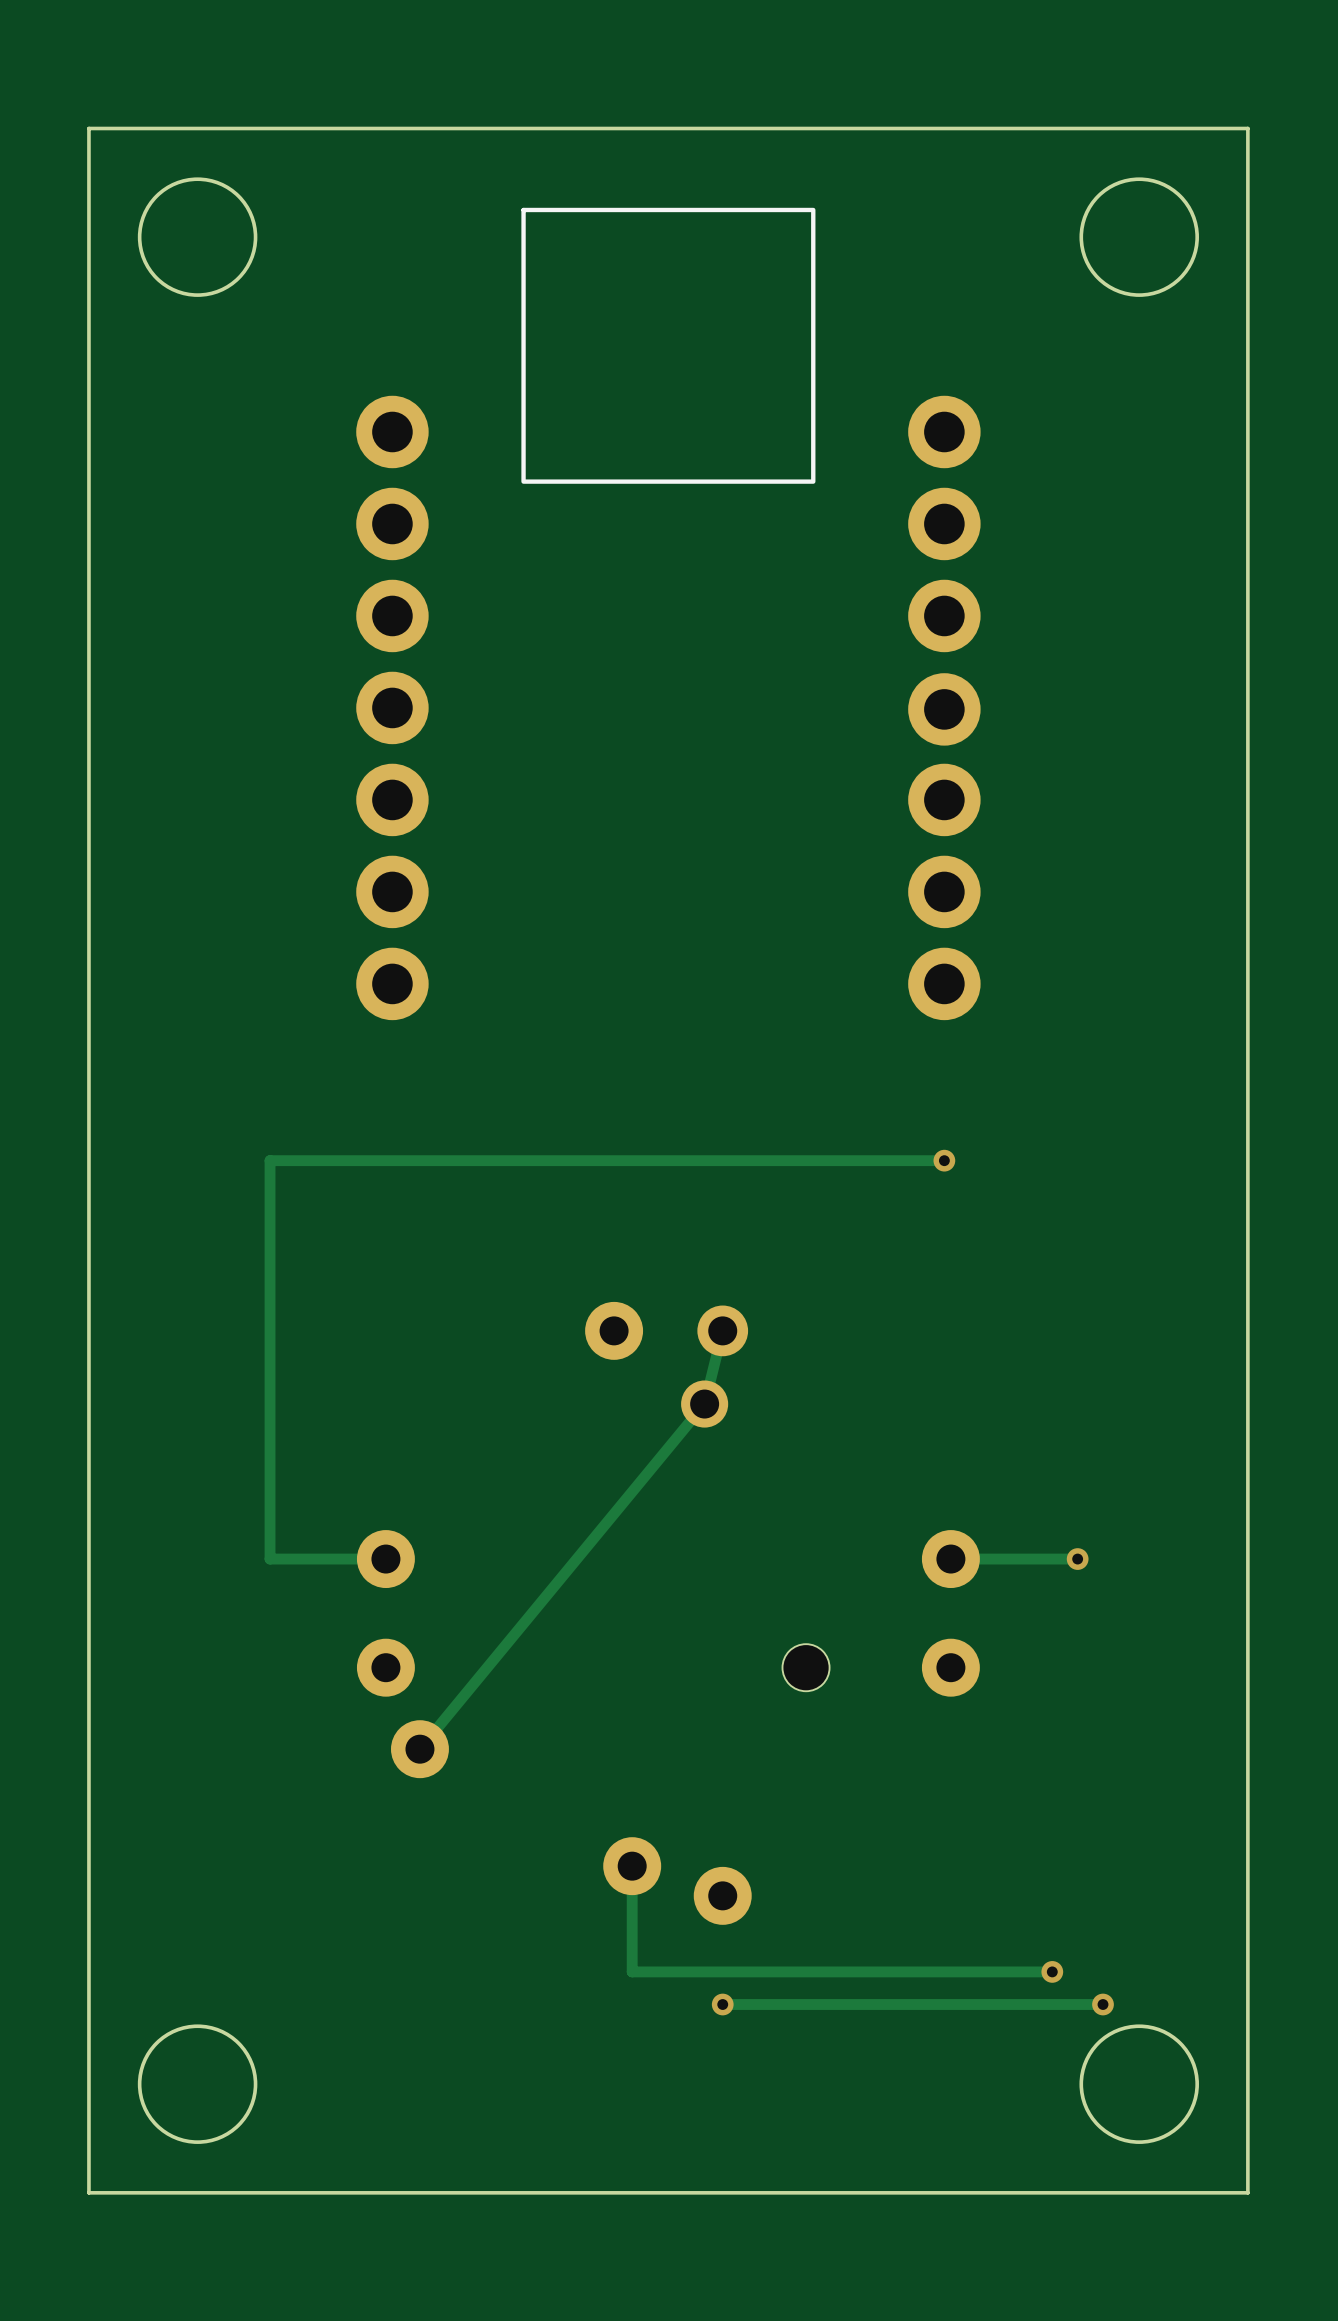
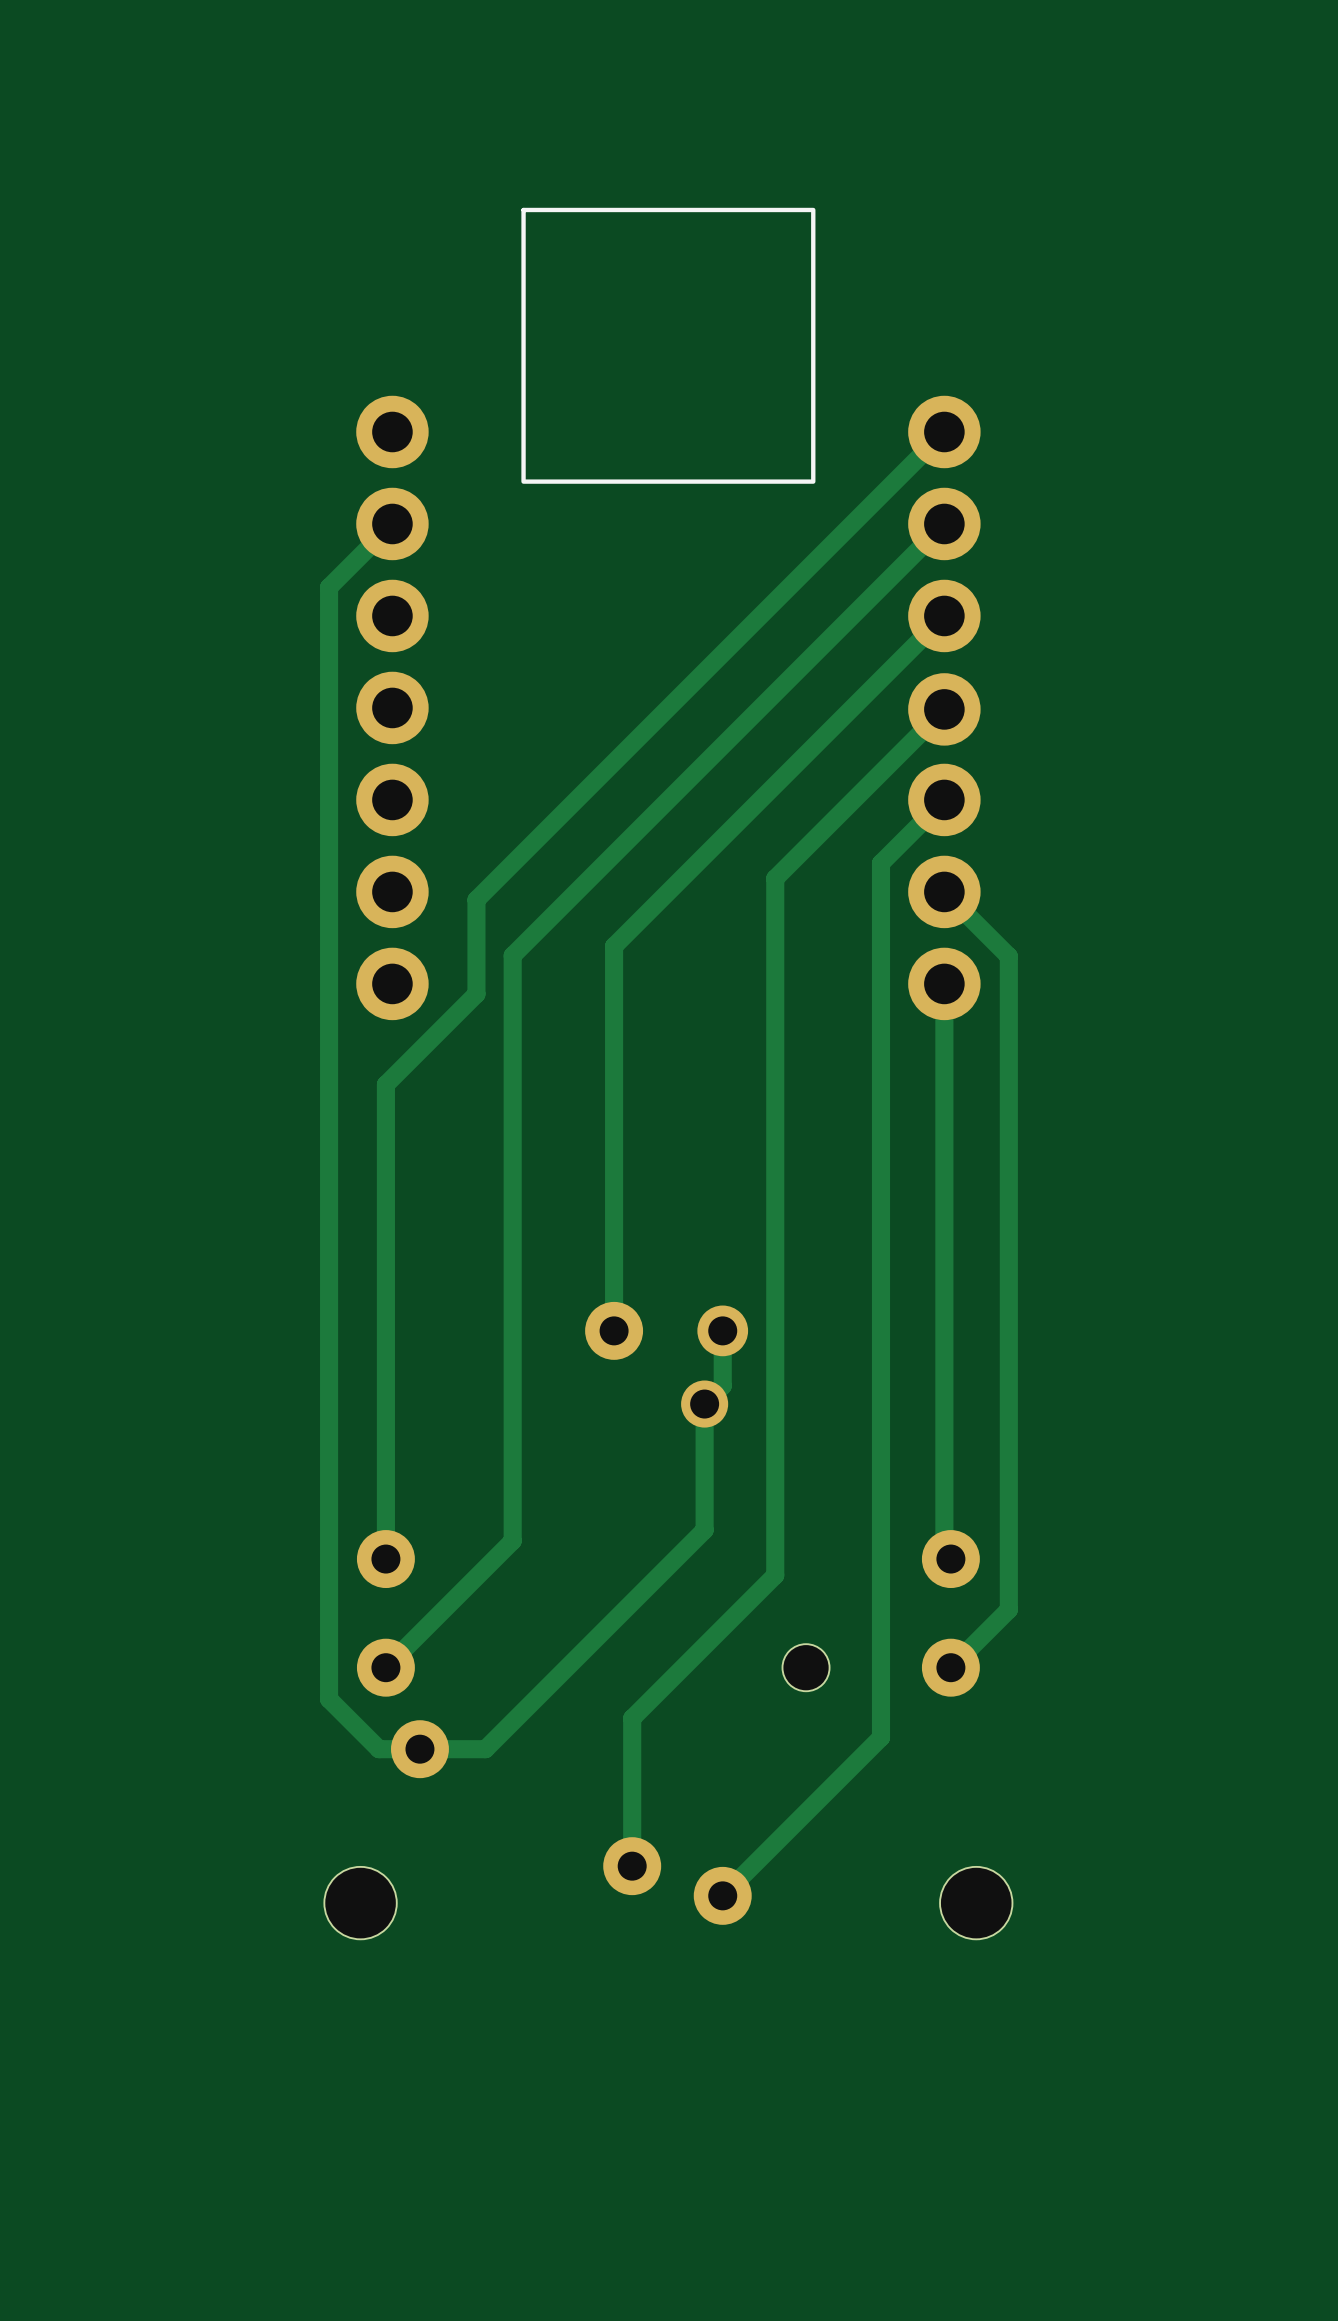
board edge: (1247, 128) (88, 128) (88, 2192) (1247, 2192) (1247, 128) -> none
round board edge: [137, 177, 258, 297] -> none
round board edge: [1079, 177, 1199, 297] -> none
track: none -> (944, 523) (512, 955) (512, 1540) (385, 1667)
track: none -> (944, 615) (614, 946) (614, 1330)
track: none -> (944, 799) (881, 863) (881, 1737) (722, 1895)
track: none -> (944, 891) (1008, 956) (1008, 1609) (950, 1667)
track: (944, 1160) (270, 1160) (270, 1559) (385, 1559) -> (944, 431) (476, 899) (476, 994) (385, 1084) (385, 1559)
via: (944, 1160) -> none
track: (722, 1330) (704, 1404) (419, 1749) -> (722, 1330) (722, 1385) (704, 1404) (704, 1530) (485, 1749) (378, 1749) (329, 1699) (329, 587) (392, 523)
track: (1077, 1559) (950, 1559) -> (944, 983) (944, 1552) (950, 1559)
via: (1077, 1559) -> none
track: (632, 1866) (632, 1971) (1052, 1971) -> (632, 1866) (632, 1718) (775, 1575) (775, 878) (944, 709)
part: none -> (360, 1903)
part: none -> (976, 1903)
via: (1052, 1971) -> none
via: (722, 2004) -> none
track: (1103, 2004) (722, 2004) -> none
via: (1103, 2004) -> none
round board edge: [137, 2024, 258, 2144] -> none
round board edge: [1079, 2024, 1199, 2144] -> none

